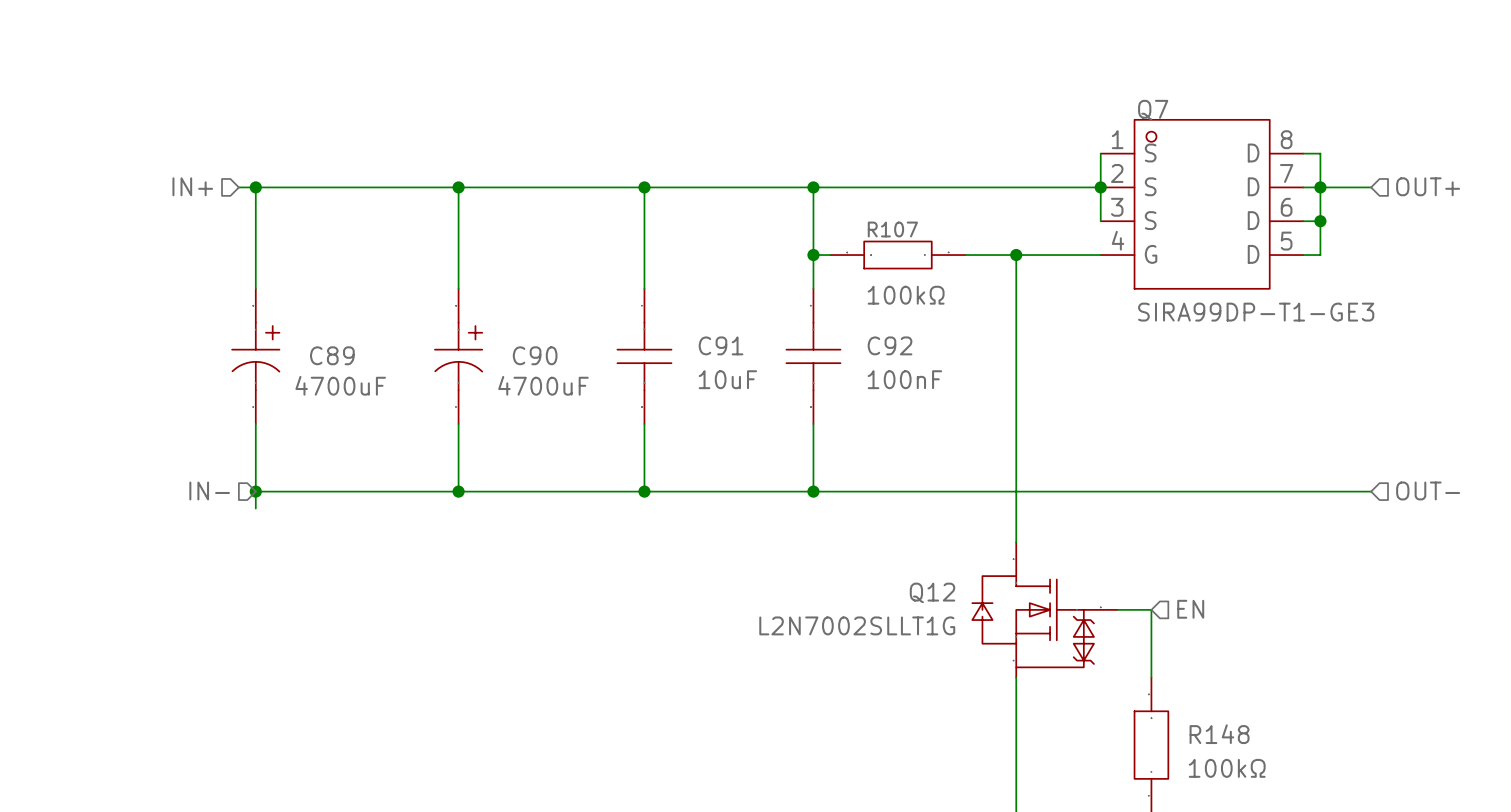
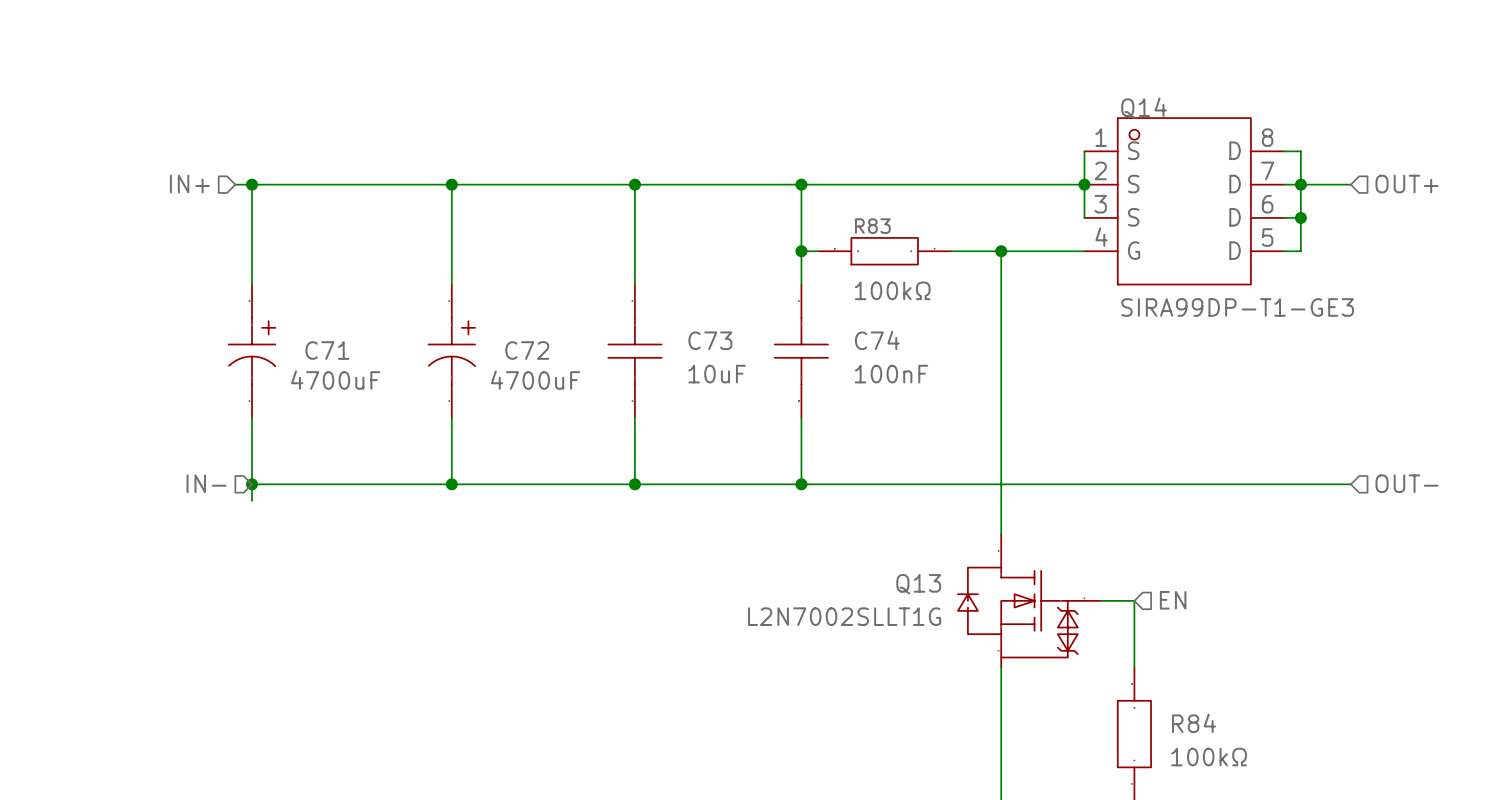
Q7 name: Q7 (1153, 110) -> Q14 (1144, 108)
R107 name: R107 (892, 229) -> R83 (872, 226)
C91 name: C91 (721, 345) -> C73 (710, 340)
C92 name: C92 (890, 345) -> C74 (877, 340)
C89 name: C89 (332, 355) -> C71 (327, 350)
C90 name: C90 (535, 355) -> C72 (527, 350)
Q12 name: Q12 (932, 592) -> Q13 (918, 584)
R148 name: R148 (1219, 734) -> R84 (1194, 723)

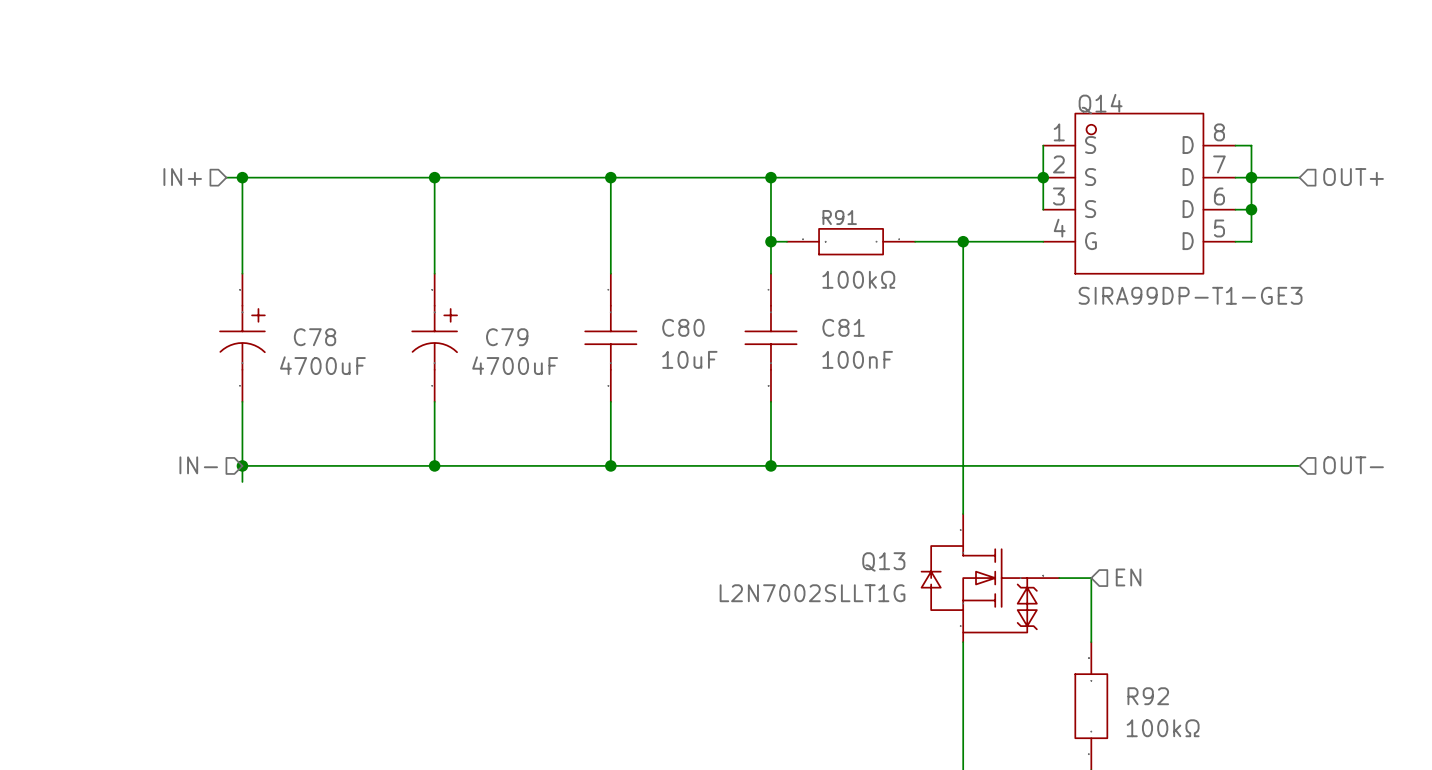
R83 name: R83 (872, 226) -> R91 (839, 217)
C73 name: C73 (710, 340) -> C80 (683, 327)
C74 name: C74 (877, 340) -> C81 (843, 327)
C71 name: C71 (327, 350) -> C78 (315, 337)
C72 name: C72 (527, 350) -> C79 (507, 337)
R84 name: R84 (1194, 723) -> R92 (1148, 696)

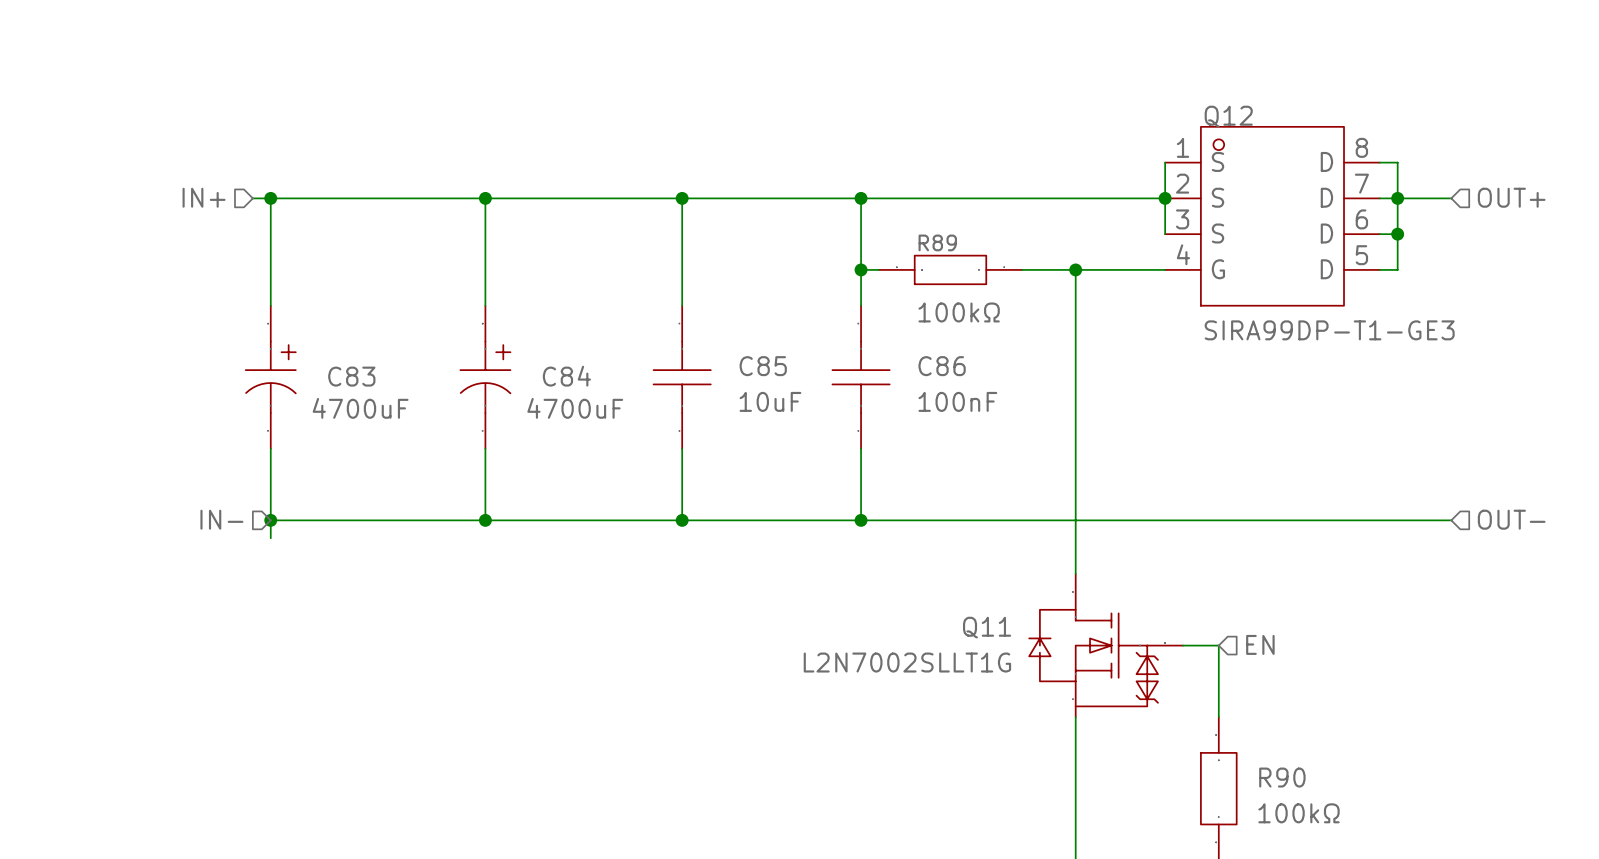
Q14 name: Q14 (1100, 103) -> Q12 (1228, 116)
R91 name: R91 (839, 217) -> R89 (937, 242)
C80 name: C80 (683, 327) -> C85 (763, 366)
C81 name: C81 (843, 327) -> C86 (942, 366)
C78 name: C78 (315, 337) -> C83 (351, 376)
C79 name: C79 (507, 337) -> C84 (566, 376)
Q13 name: Q13 (883, 561) -> Q11 (987, 627)
R92 name: R92 (1148, 696) -> R90 (1282, 777)

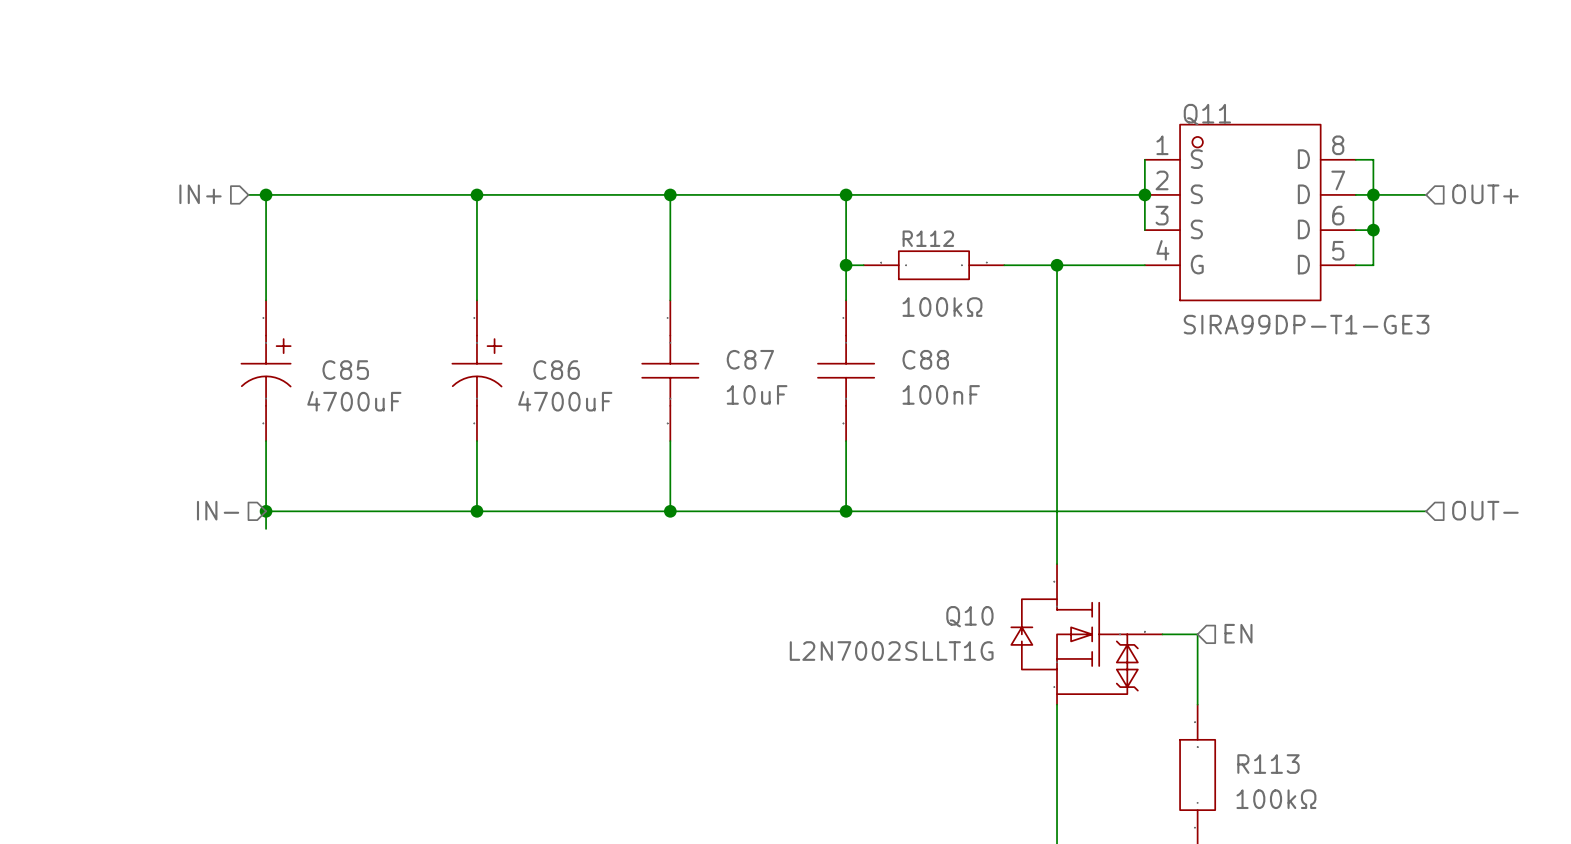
Q12 name: Q12 (1228, 116) -> Q11 (1207, 114)
R89 name: R89 (937, 242) -> R112 (928, 238)
C85 name: C85 (763, 366) -> C87 (750, 359)
C86 name: C86 (942, 366) -> C88 (925, 359)
C83 name: C83 (351, 376) -> C85 (345, 370)
C84 name: C84 (566, 376) -> C86 (556, 370)
Q11 name: Q11 (987, 627) -> Q10 (969, 616)
R90 name: R90 (1282, 777) -> R113 (1268, 764)

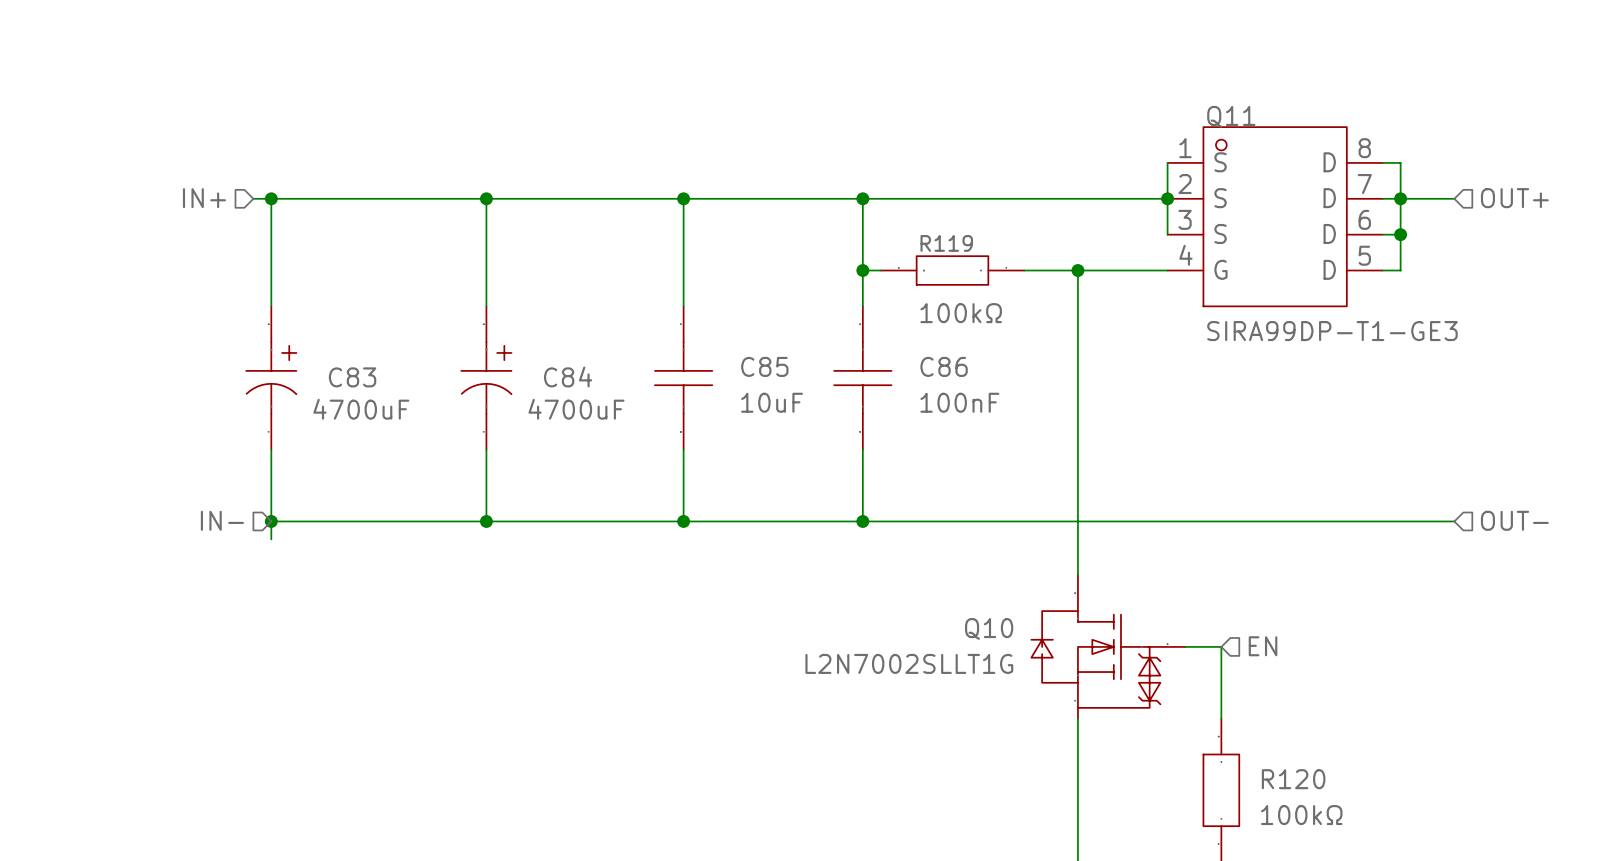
R112 name: R112 (928, 238) -> R119 (946, 243)
C87 name: C87 (750, 359) -> C85 (764, 366)
C88 name: C88 (925, 359) -> C86 (944, 366)
C85 name: C85 (345, 370) -> C83 (352, 377)
C86 name: C86 (556, 370) -> C84 (568, 376)
R113 name: R113 (1268, 764) -> R120 (1293, 779)

